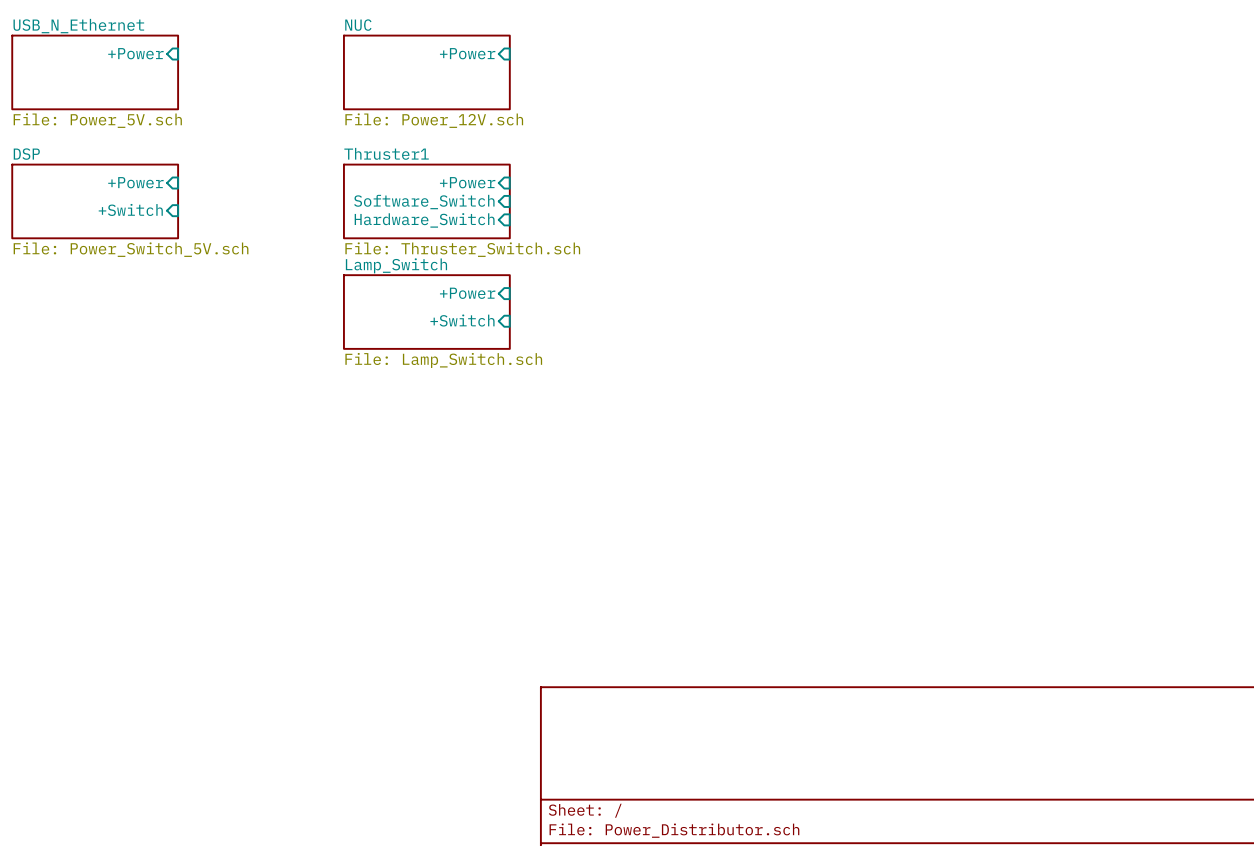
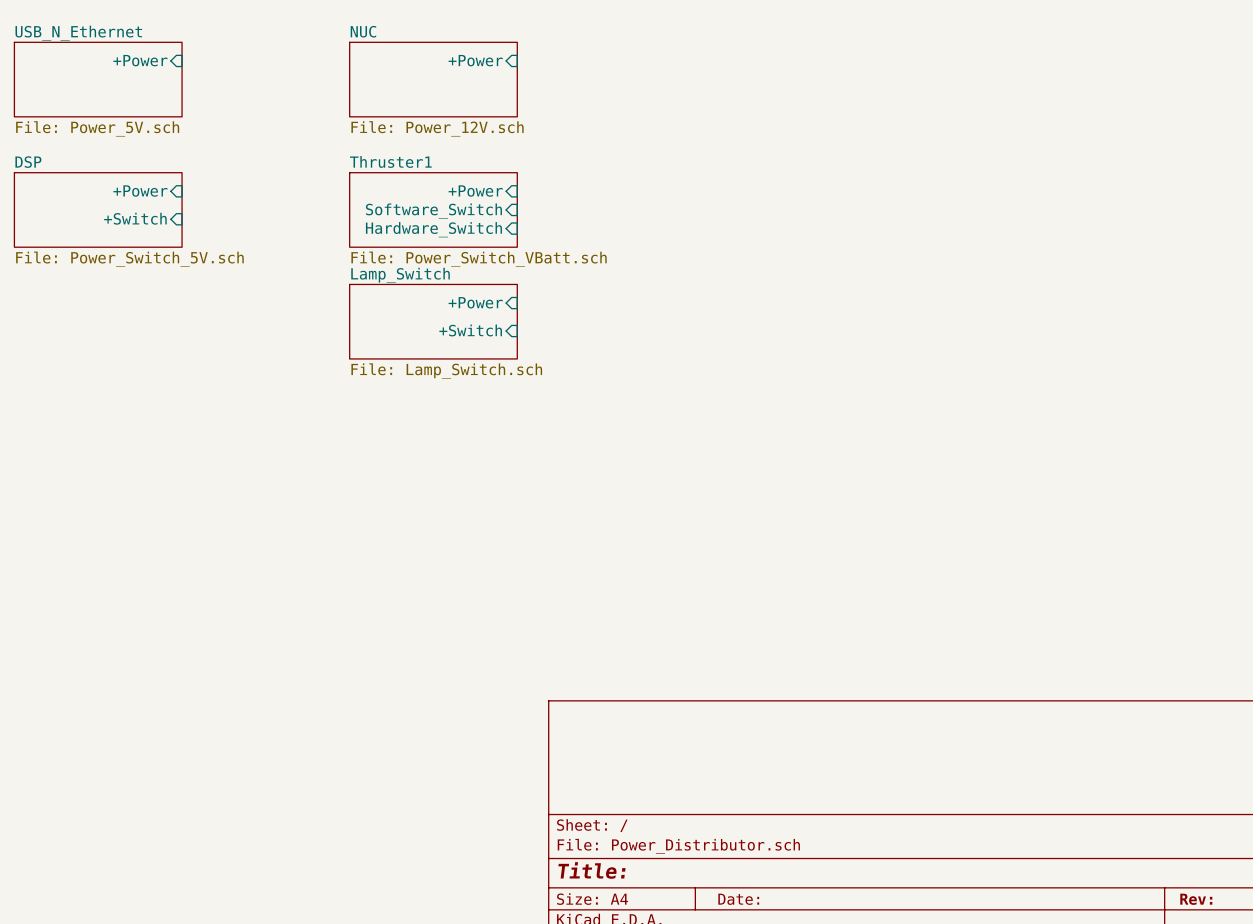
sheet Thruster1 value: File: Thruster_Switch.sch (462, 249) -> File: Power_Switch_VBatt.sch (479, 259)

